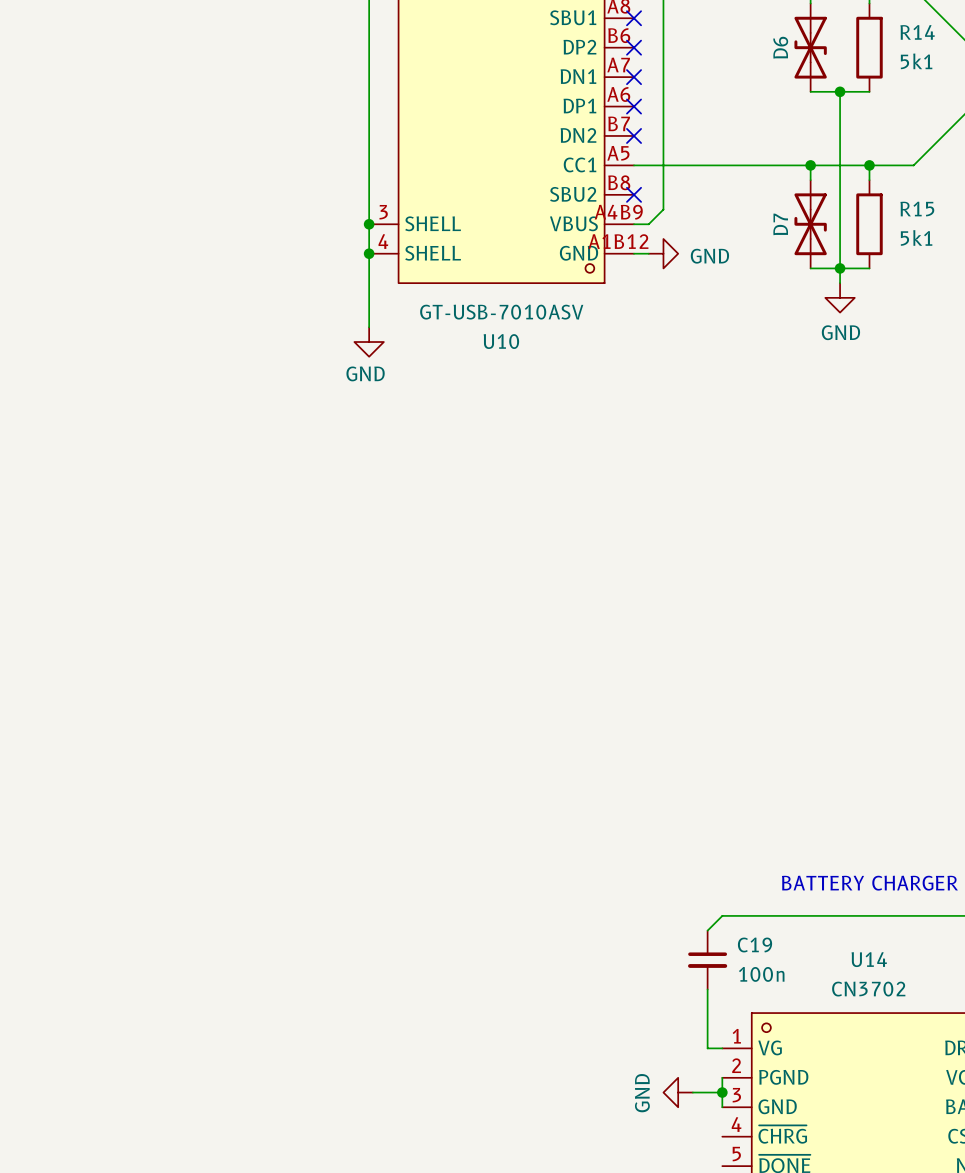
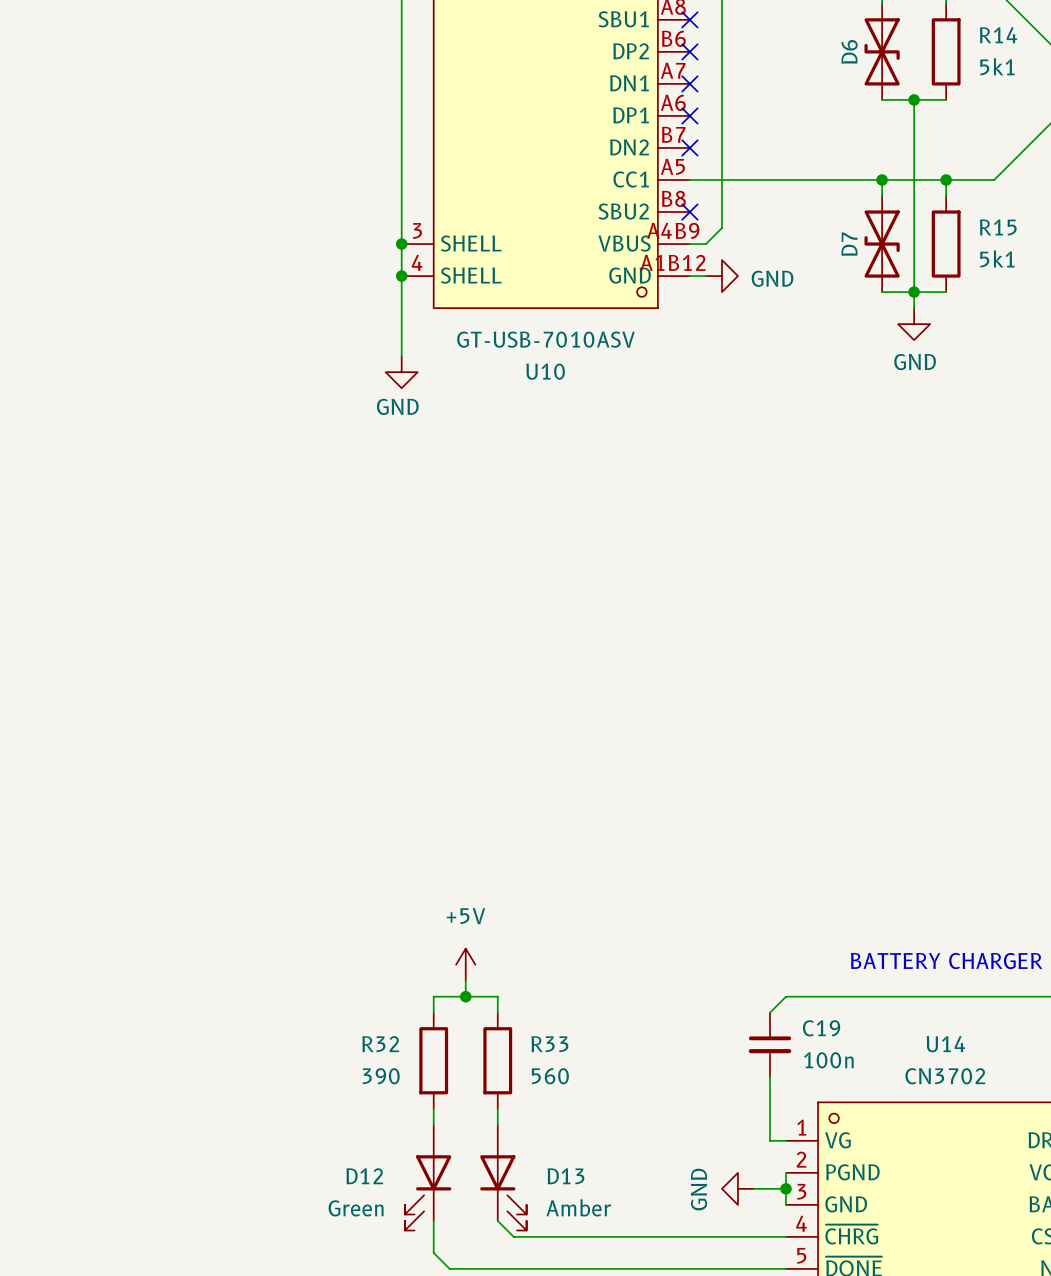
power symbol: none -> +5V (465, 964)
wire: none -> (465, 980) (465, 996)
junction: none -> (465, 996)
wire: none -> (433, 1012) (433, 996) (497, 996) (497, 1012)
R32: none -> 390 (433, 1060)
R33: none -> 560 (497, 1060)
wire: none -> (433, 1108) (433, 1124)
wire: none -> (497, 1108) (497, 1124)
D12: none -> Green (428, 1177)
D13: none -> Amber (503, 1177)
wire: none -> (433, 1220) (433, 1252) (449, 1268) (786, 1268)
wire: none -> (497, 1220) (513, 1236) (786, 1236)

